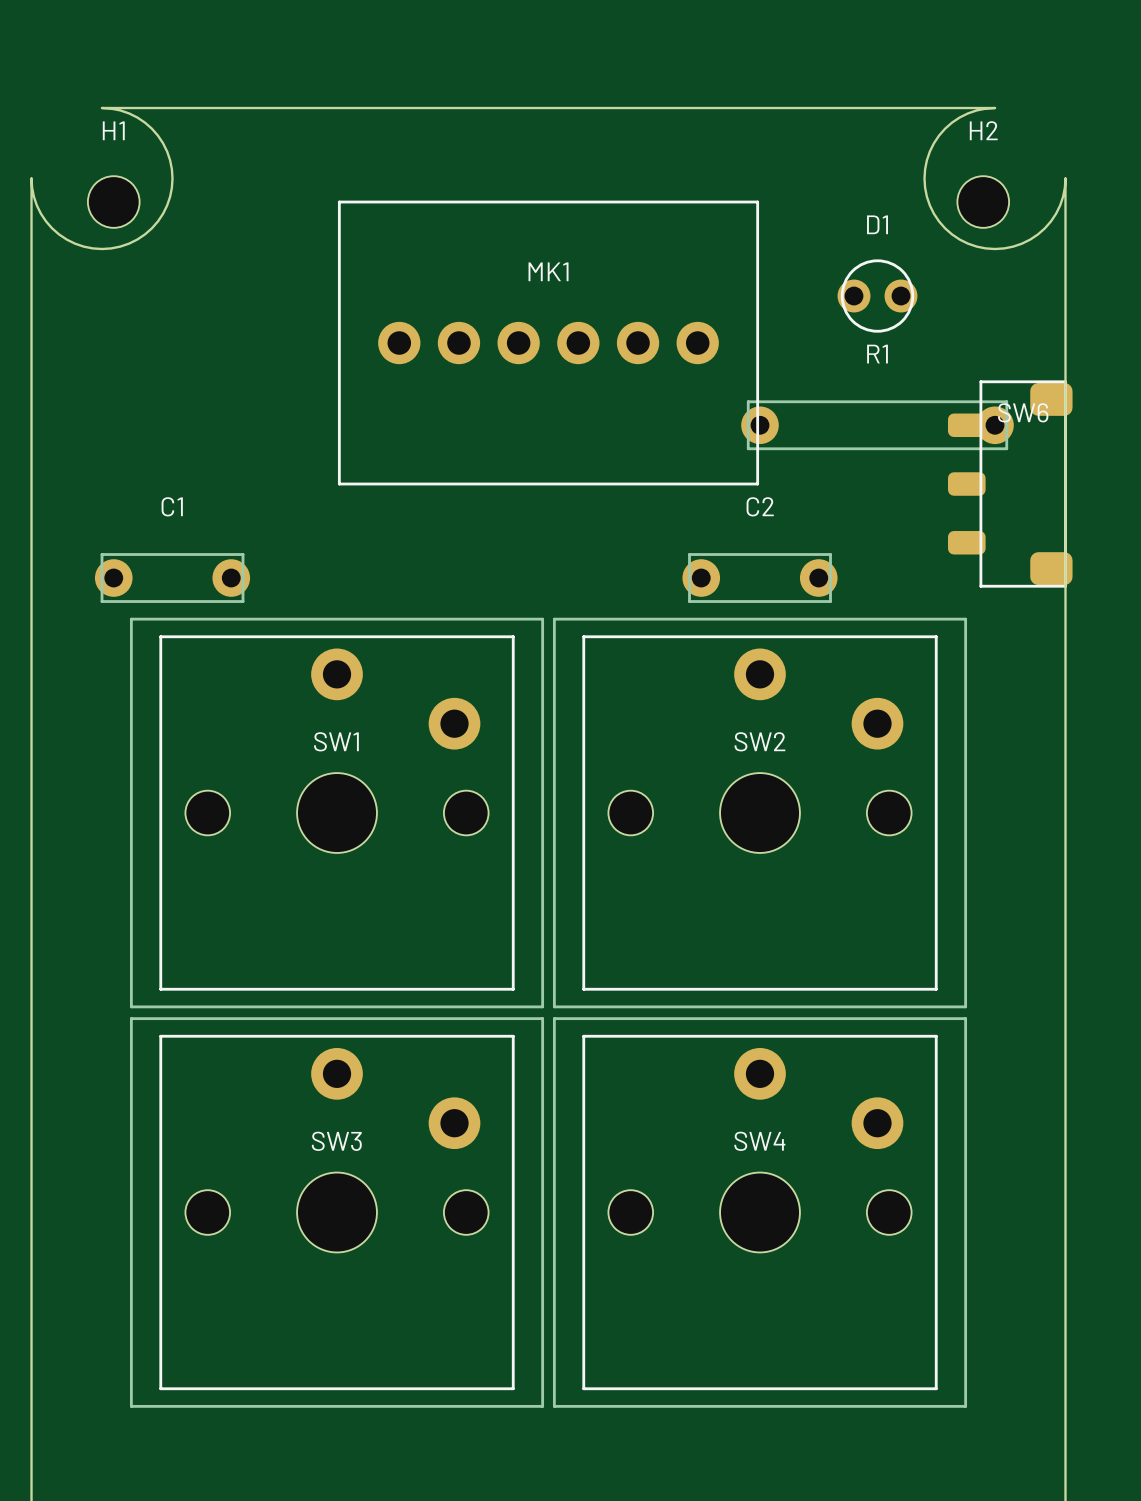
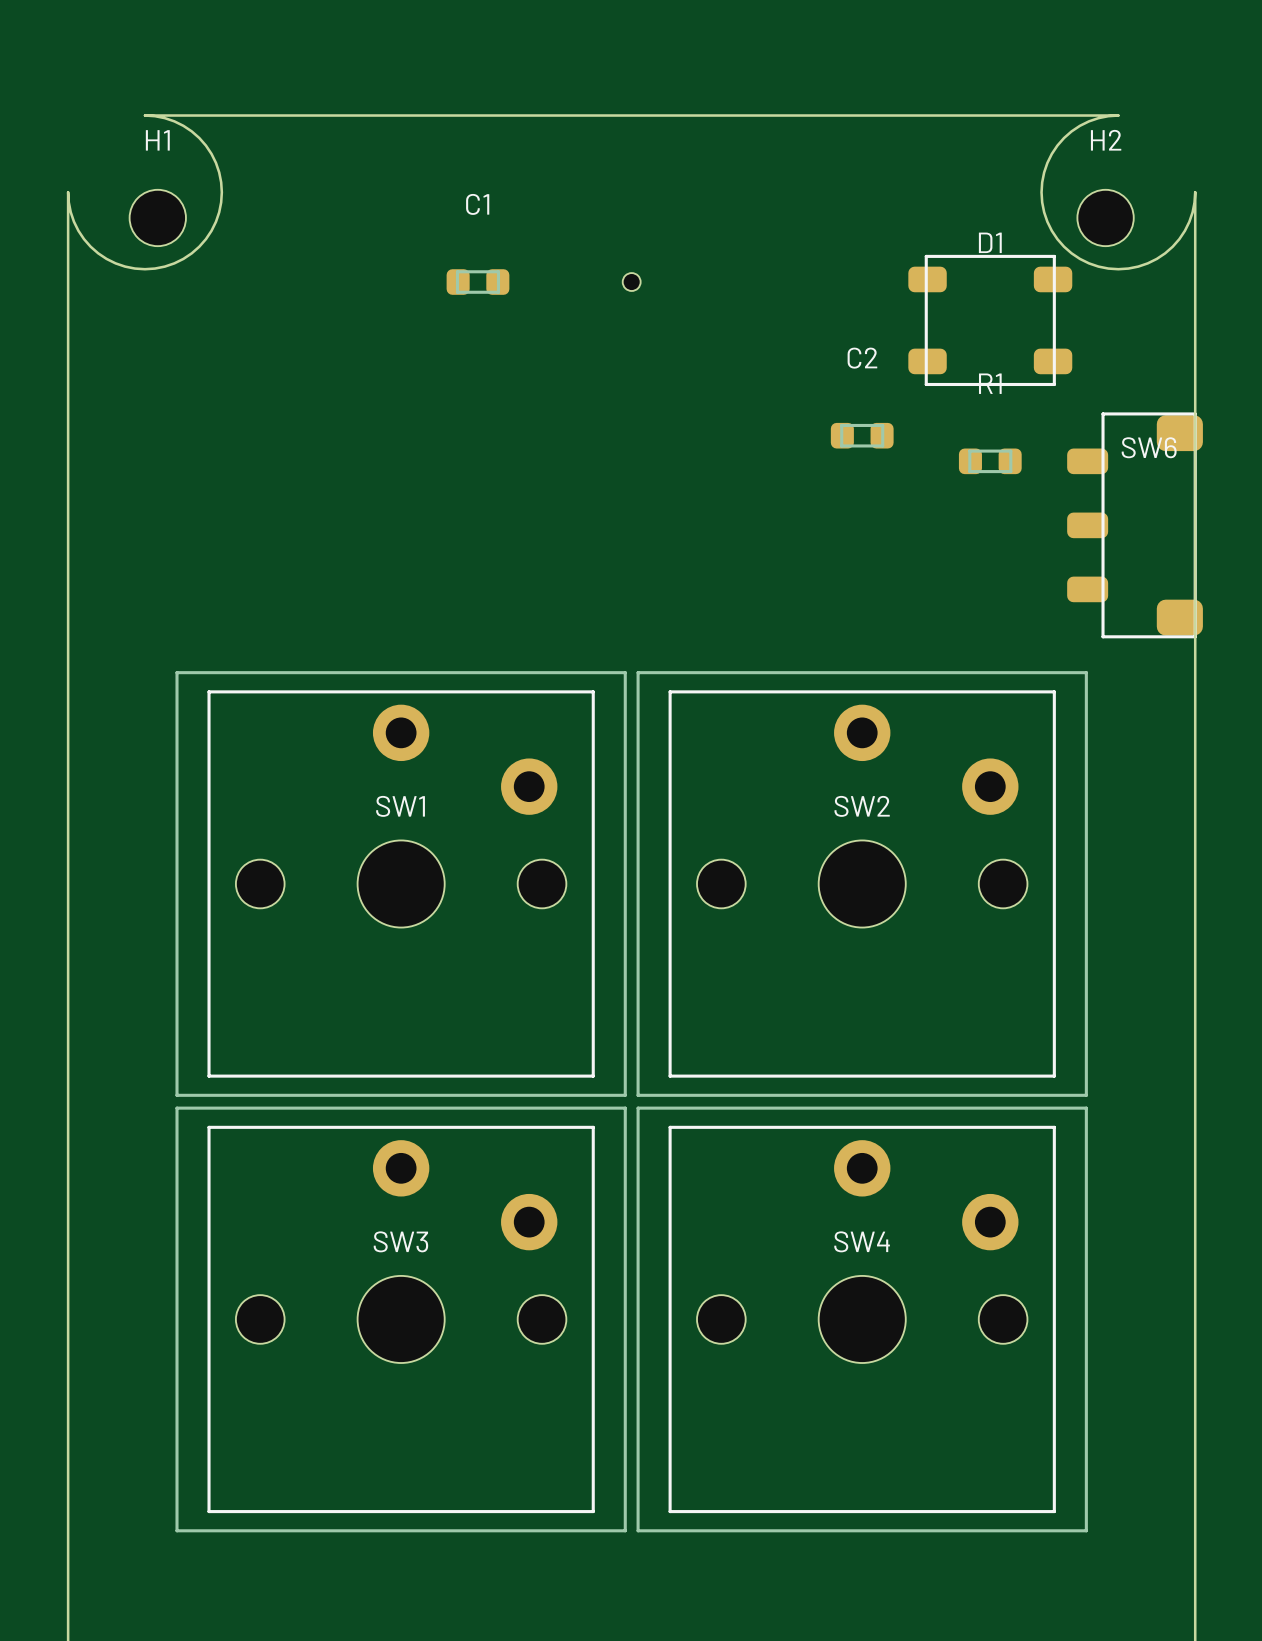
D1 footprint: [837, 259, 918, 333] -> [908, 254, 1073, 387]
part: none -> (631, 282)
MK1: (548, 343) -> none
R1 footprint: [741, 400, 1014, 451] -> [958, 448, 1022, 475]
C1 footprint: [94, 553, 251, 603] -> [446, 269, 510, 295]
C2 footprint: [682, 553, 838, 603] -> [830, 422, 894, 449]

